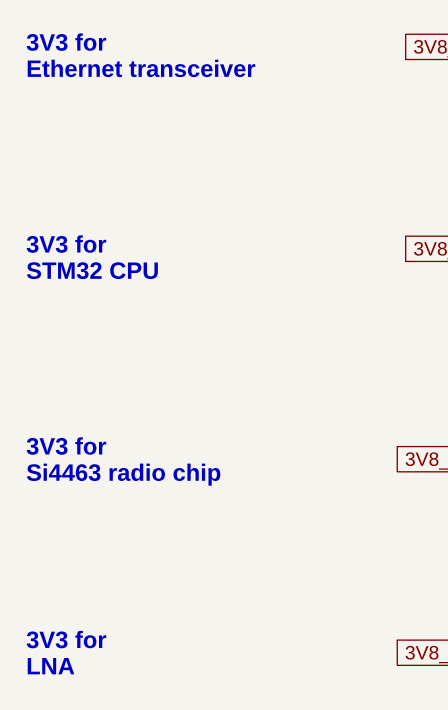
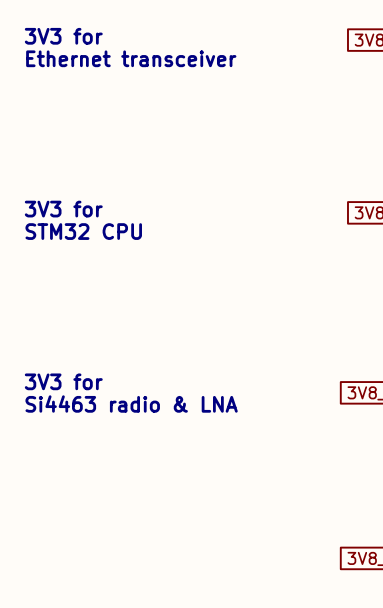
text: Si4463 radio chip (123, 474) -> Si4463 radio & LNA (131, 404)
text: 3V3 for (66, 639) -> none
text: LNA (51, 666) -> none

